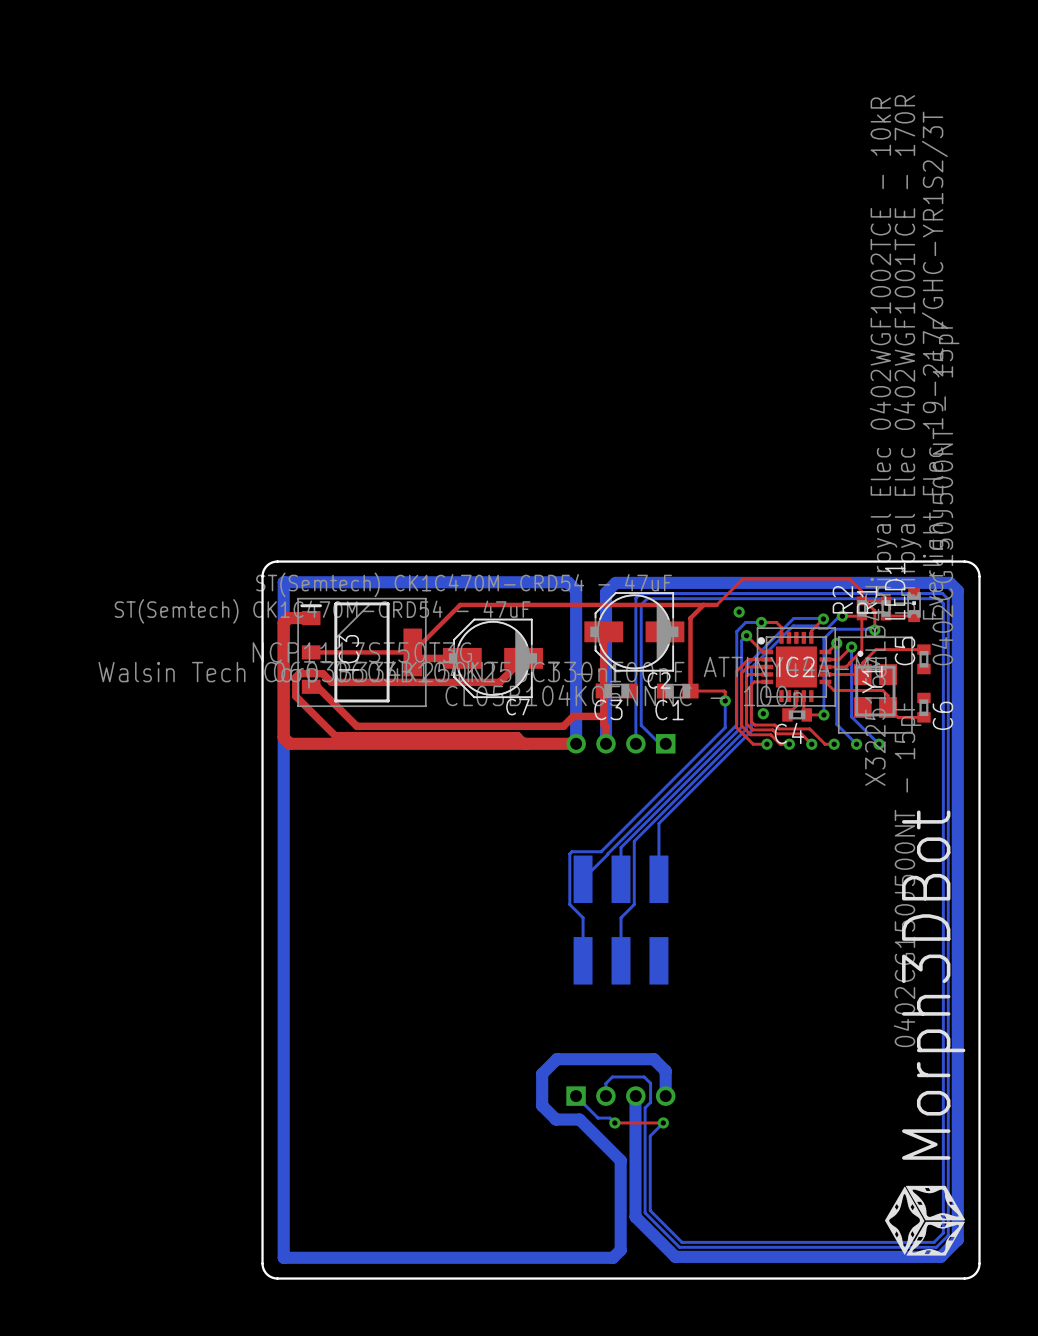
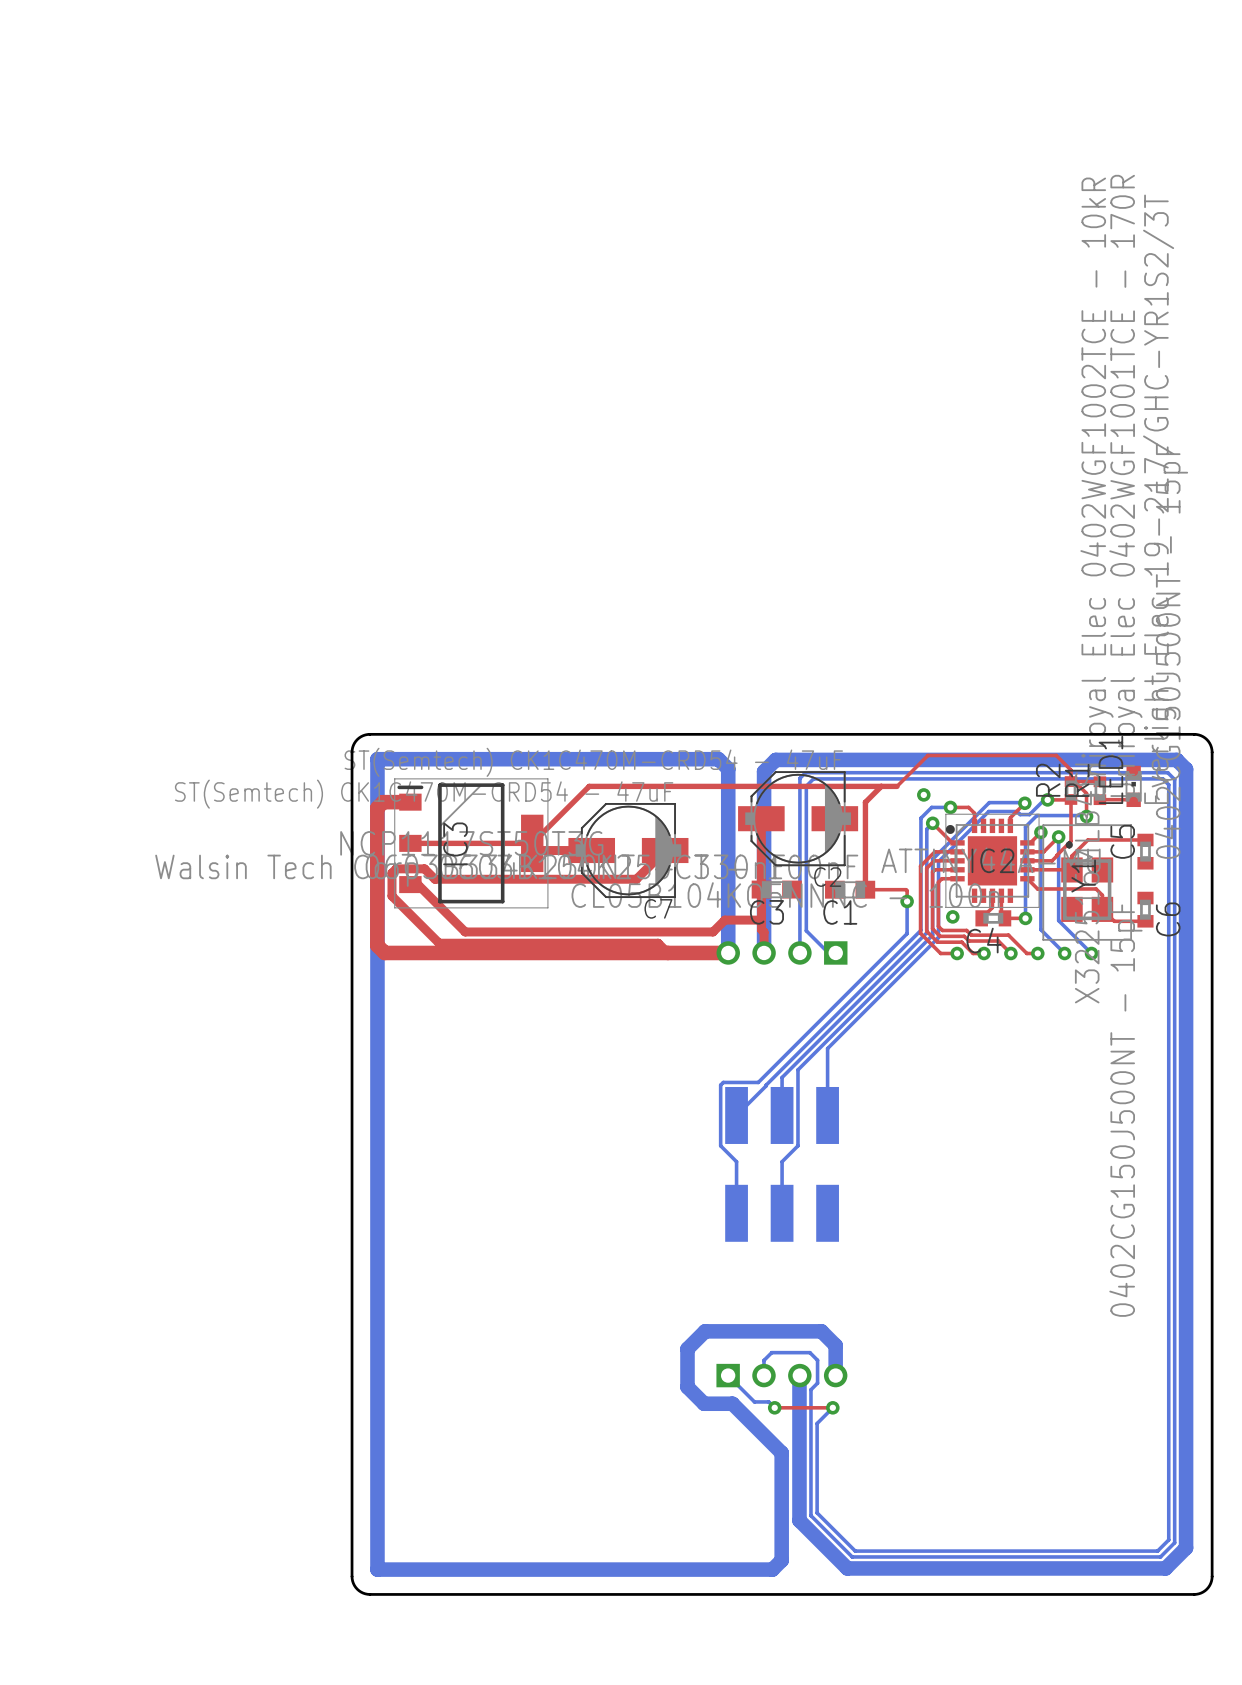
drawing: [884, 1185, 966, 1256] -> none

